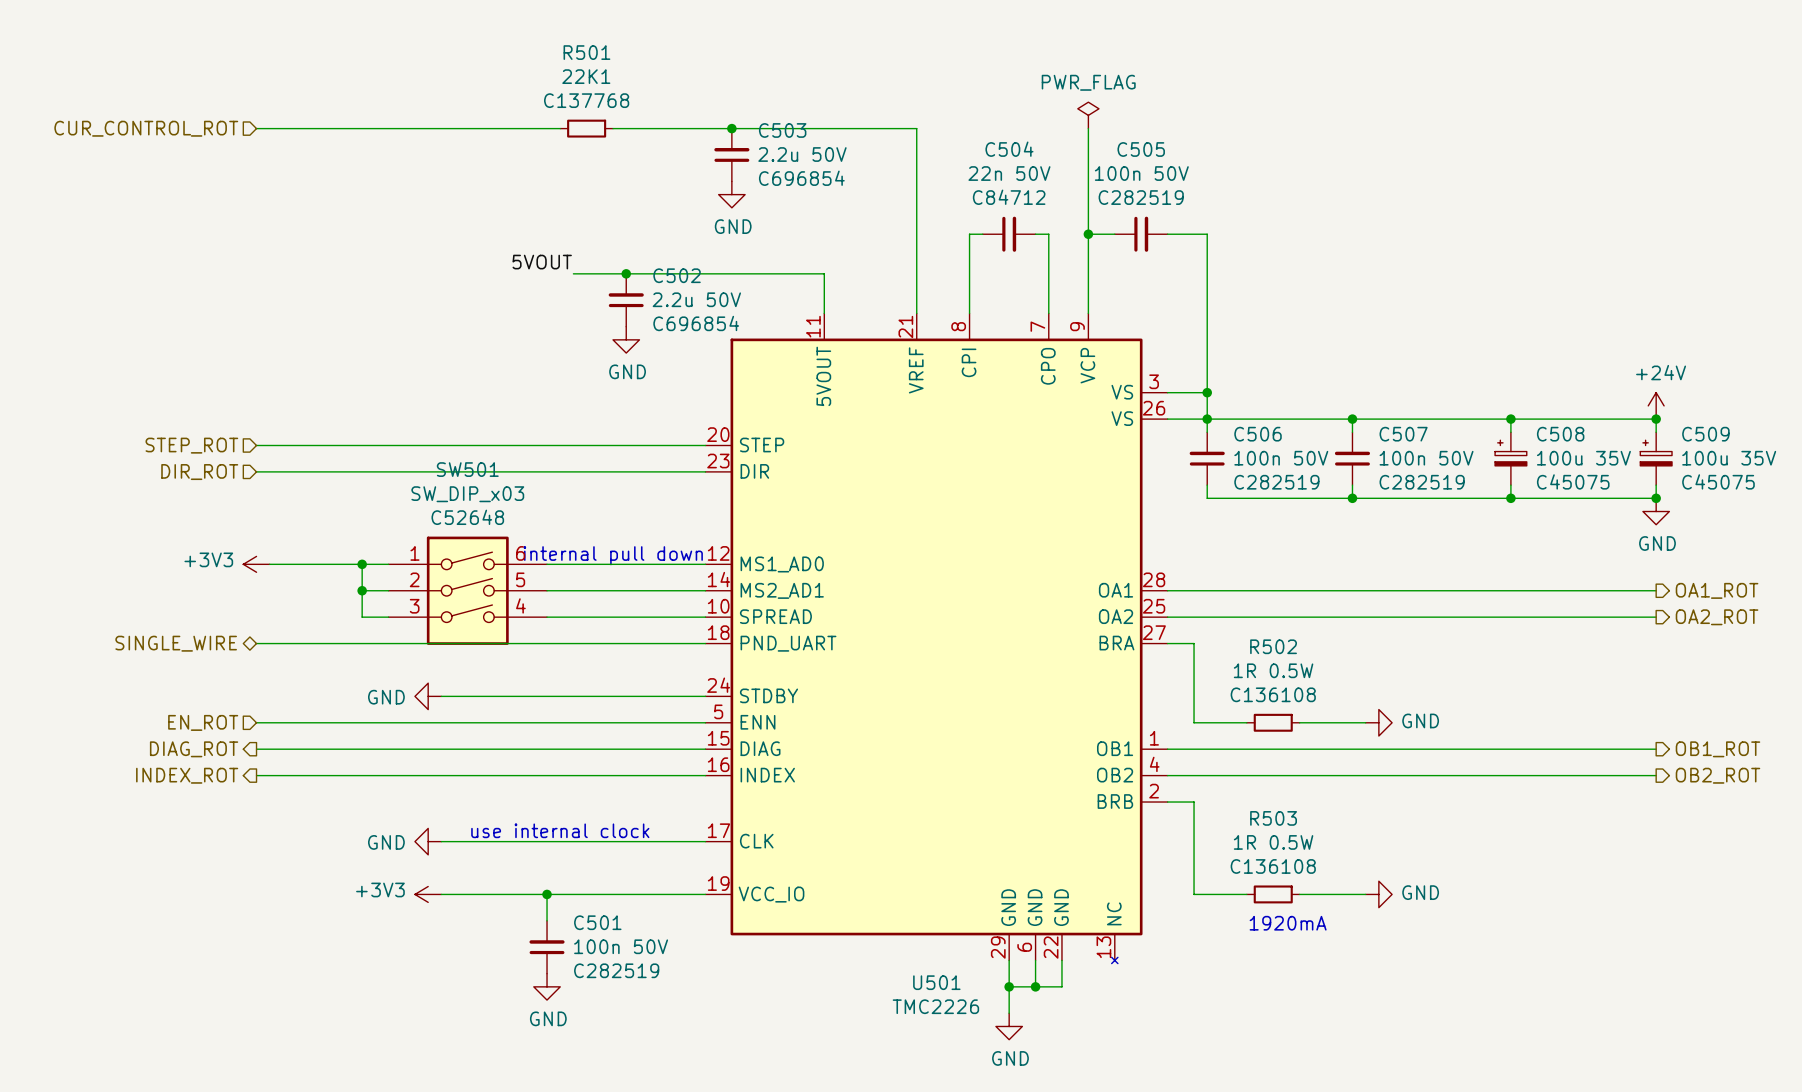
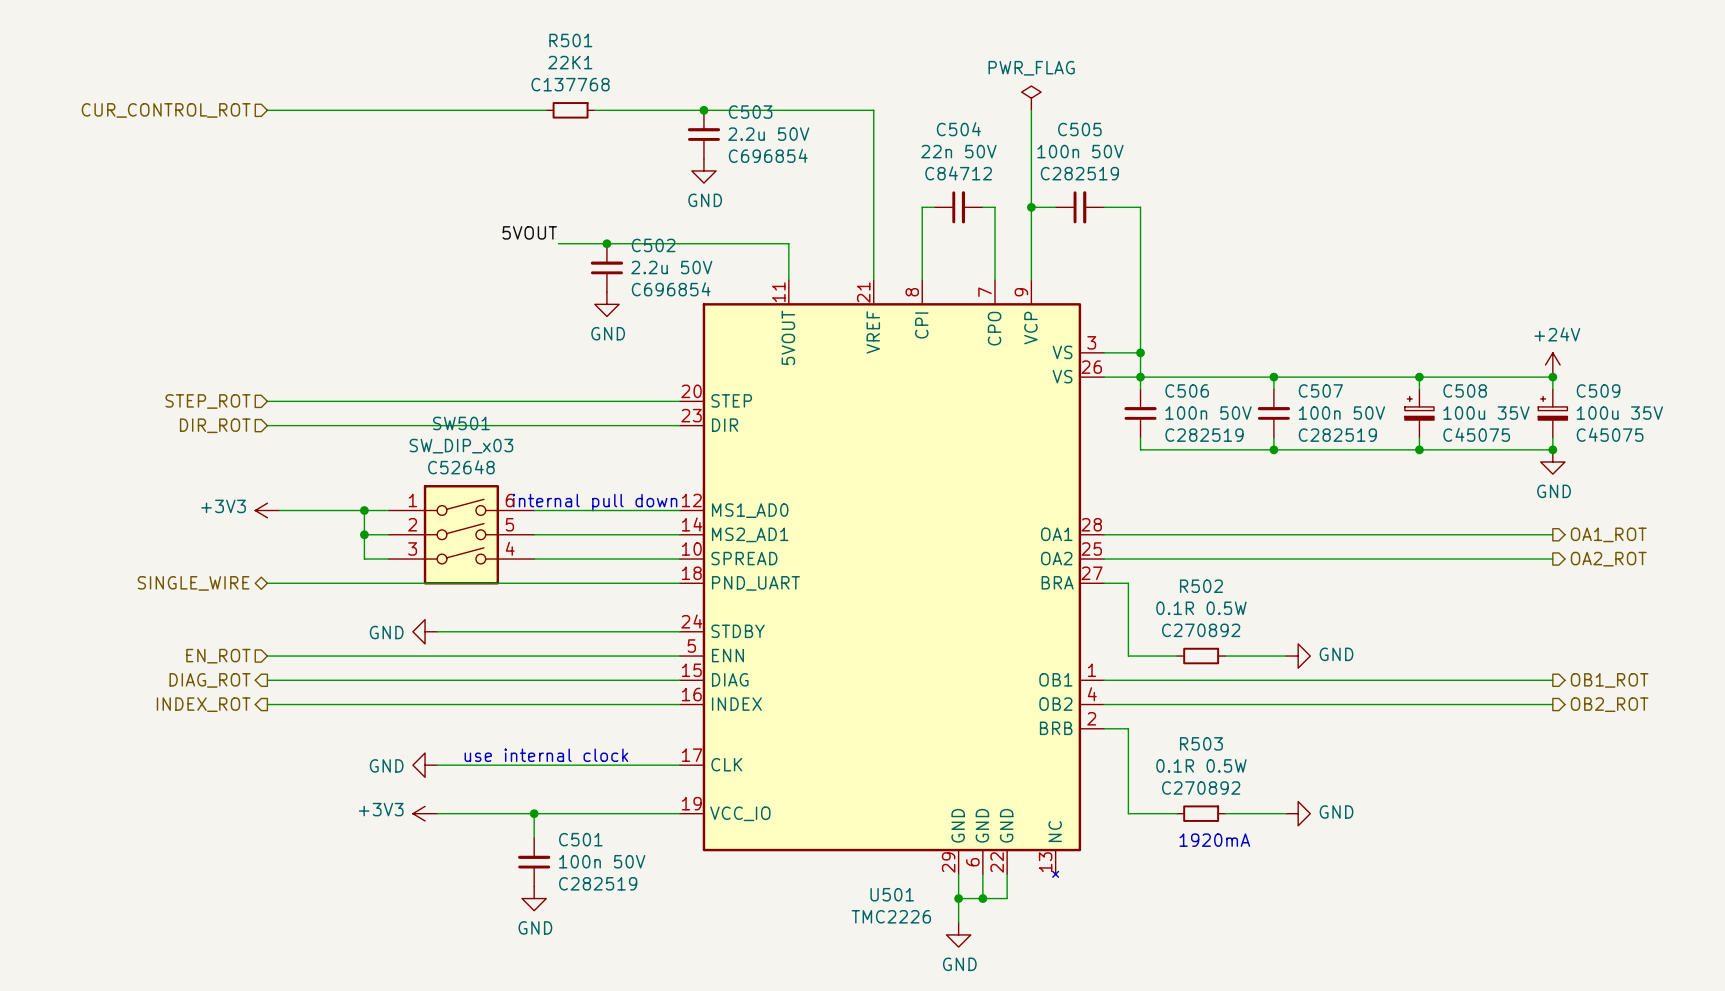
R502 value: 1R 0.5W (1273, 670) -> 0.1R 0.5W (1201, 608)
R502 text: C136108 (1273, 694) -> C270892 (1201, 630)
R503 value: 1R 0.5W (1273, 842) -> 0.1R 0.5W (1201, 765)
R503 text: C136108 (1273, 866) -> C270892 (1201, 788)

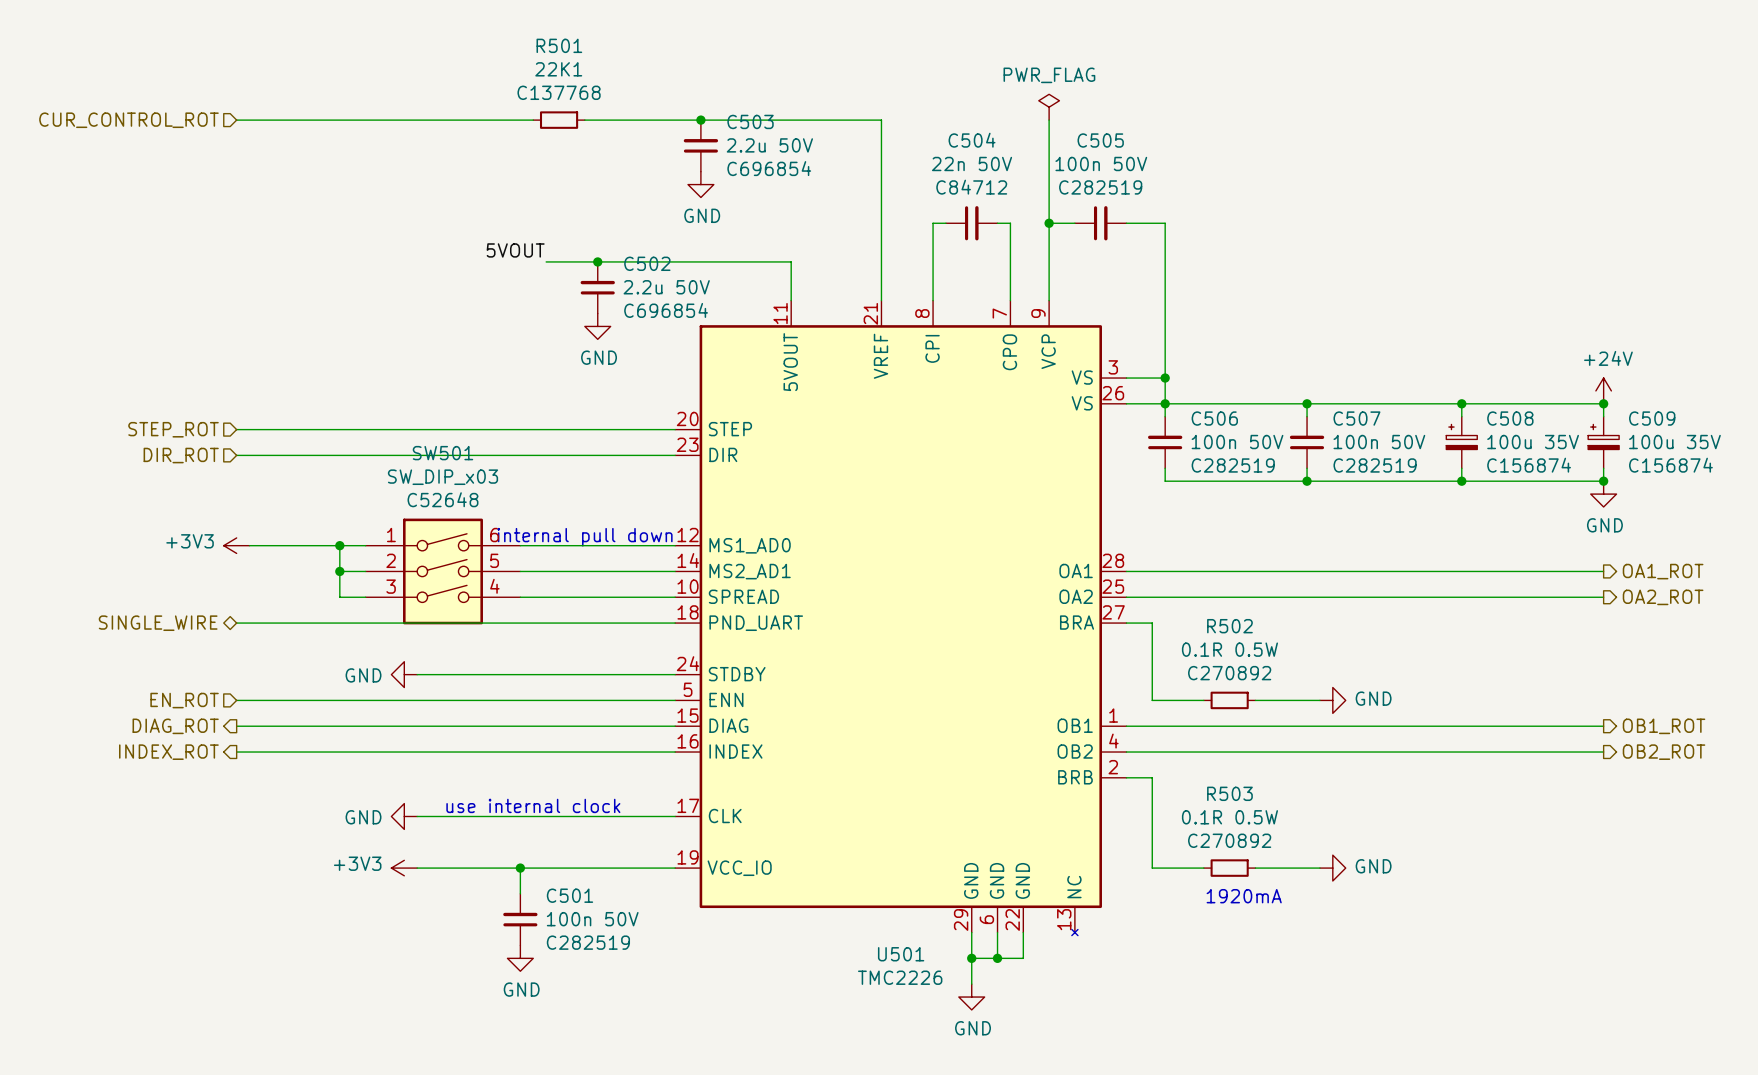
C508 text: C45075 (1476, 434) -> C156874 (1529, 465)
C509 text: C45075 (1610, 434) -> C156874 (1670, 465)

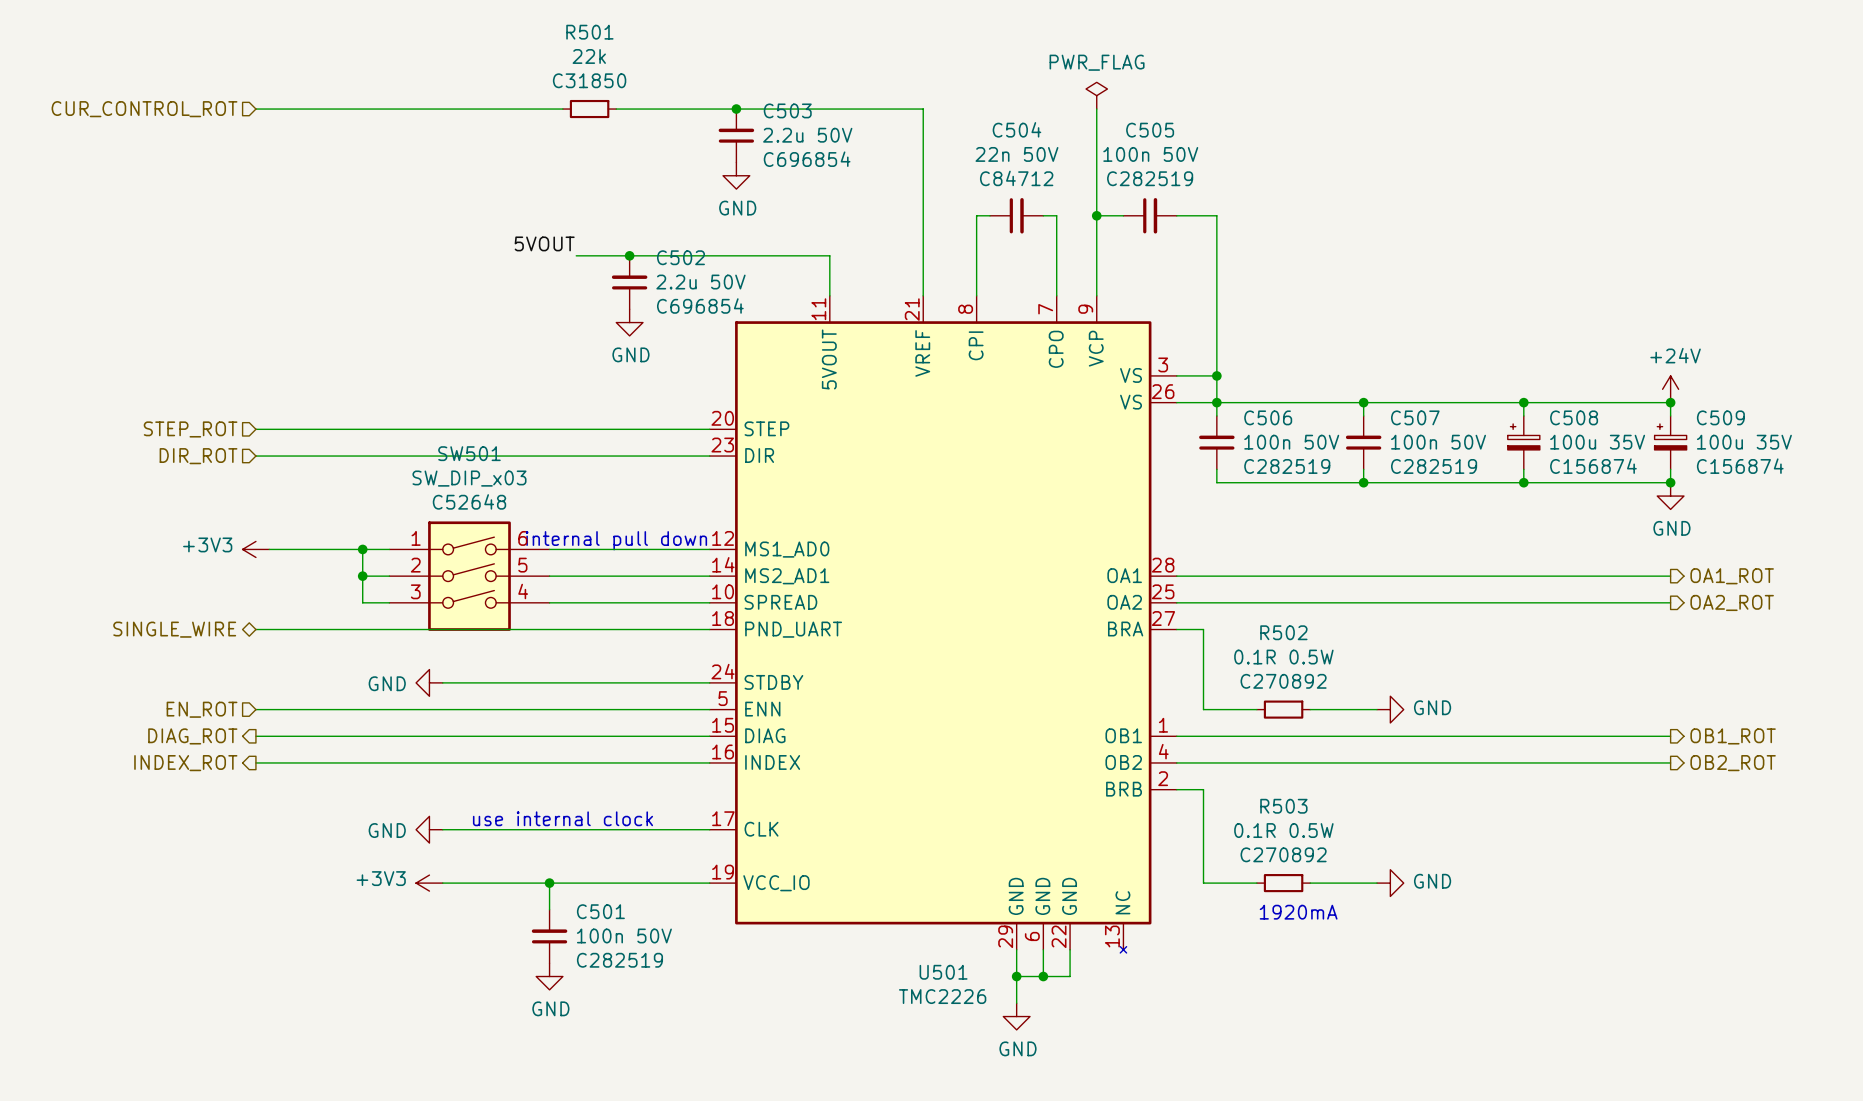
R501 value: 22K1 (558, 69) -> 22k (589, 56)
R501 text: C137768 (559, 92) -> C31850 (589, 80)

